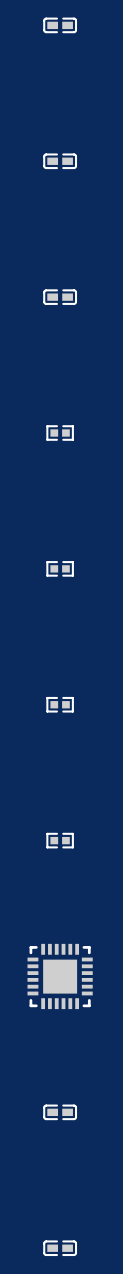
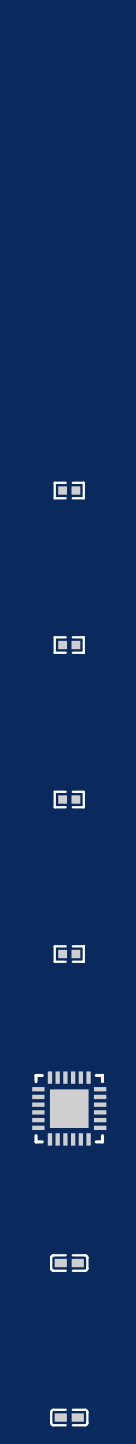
part: (60, 25) -> none
part: (60, 161) -> none
part: (60, 297) -> none

